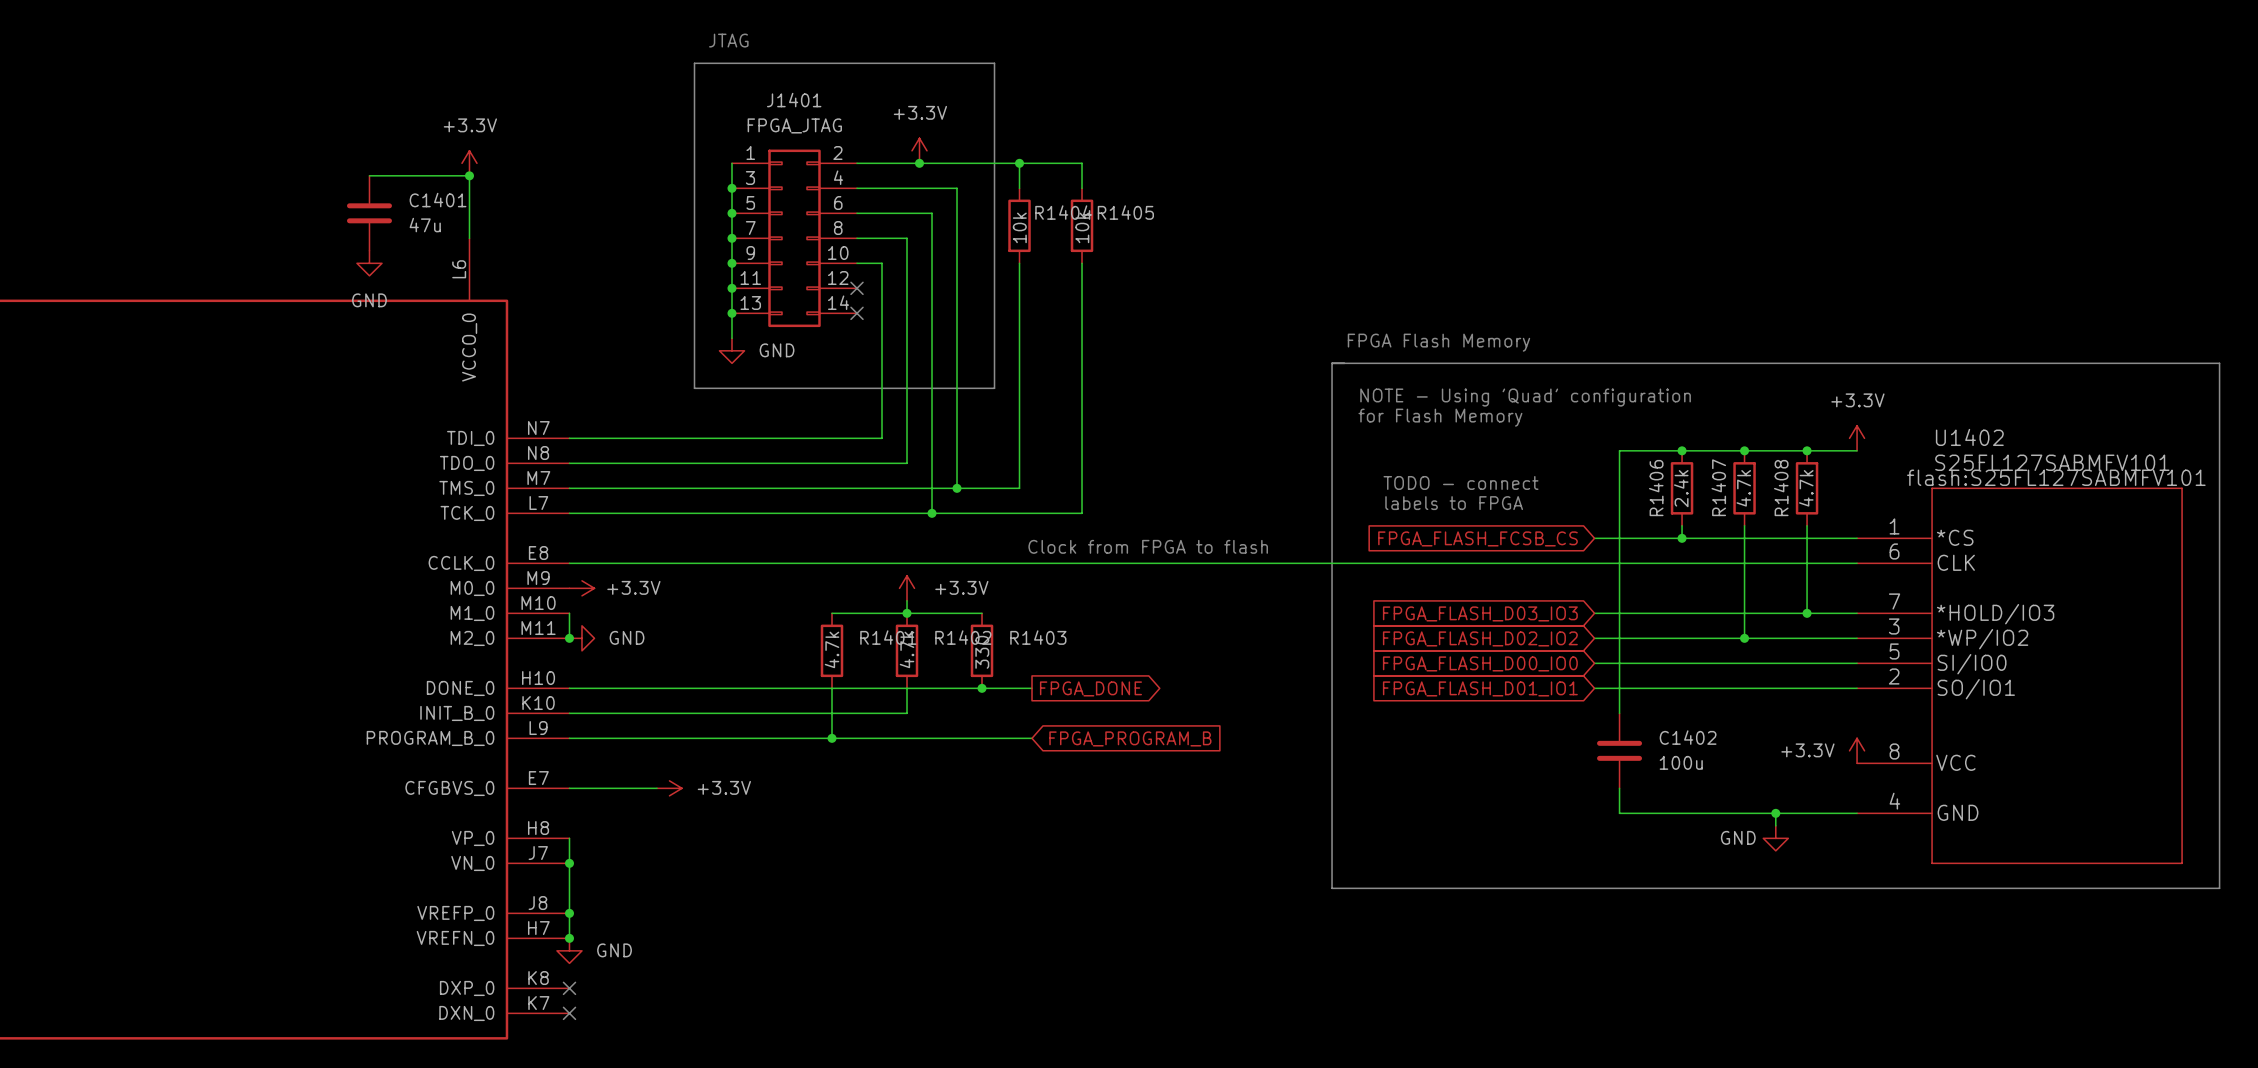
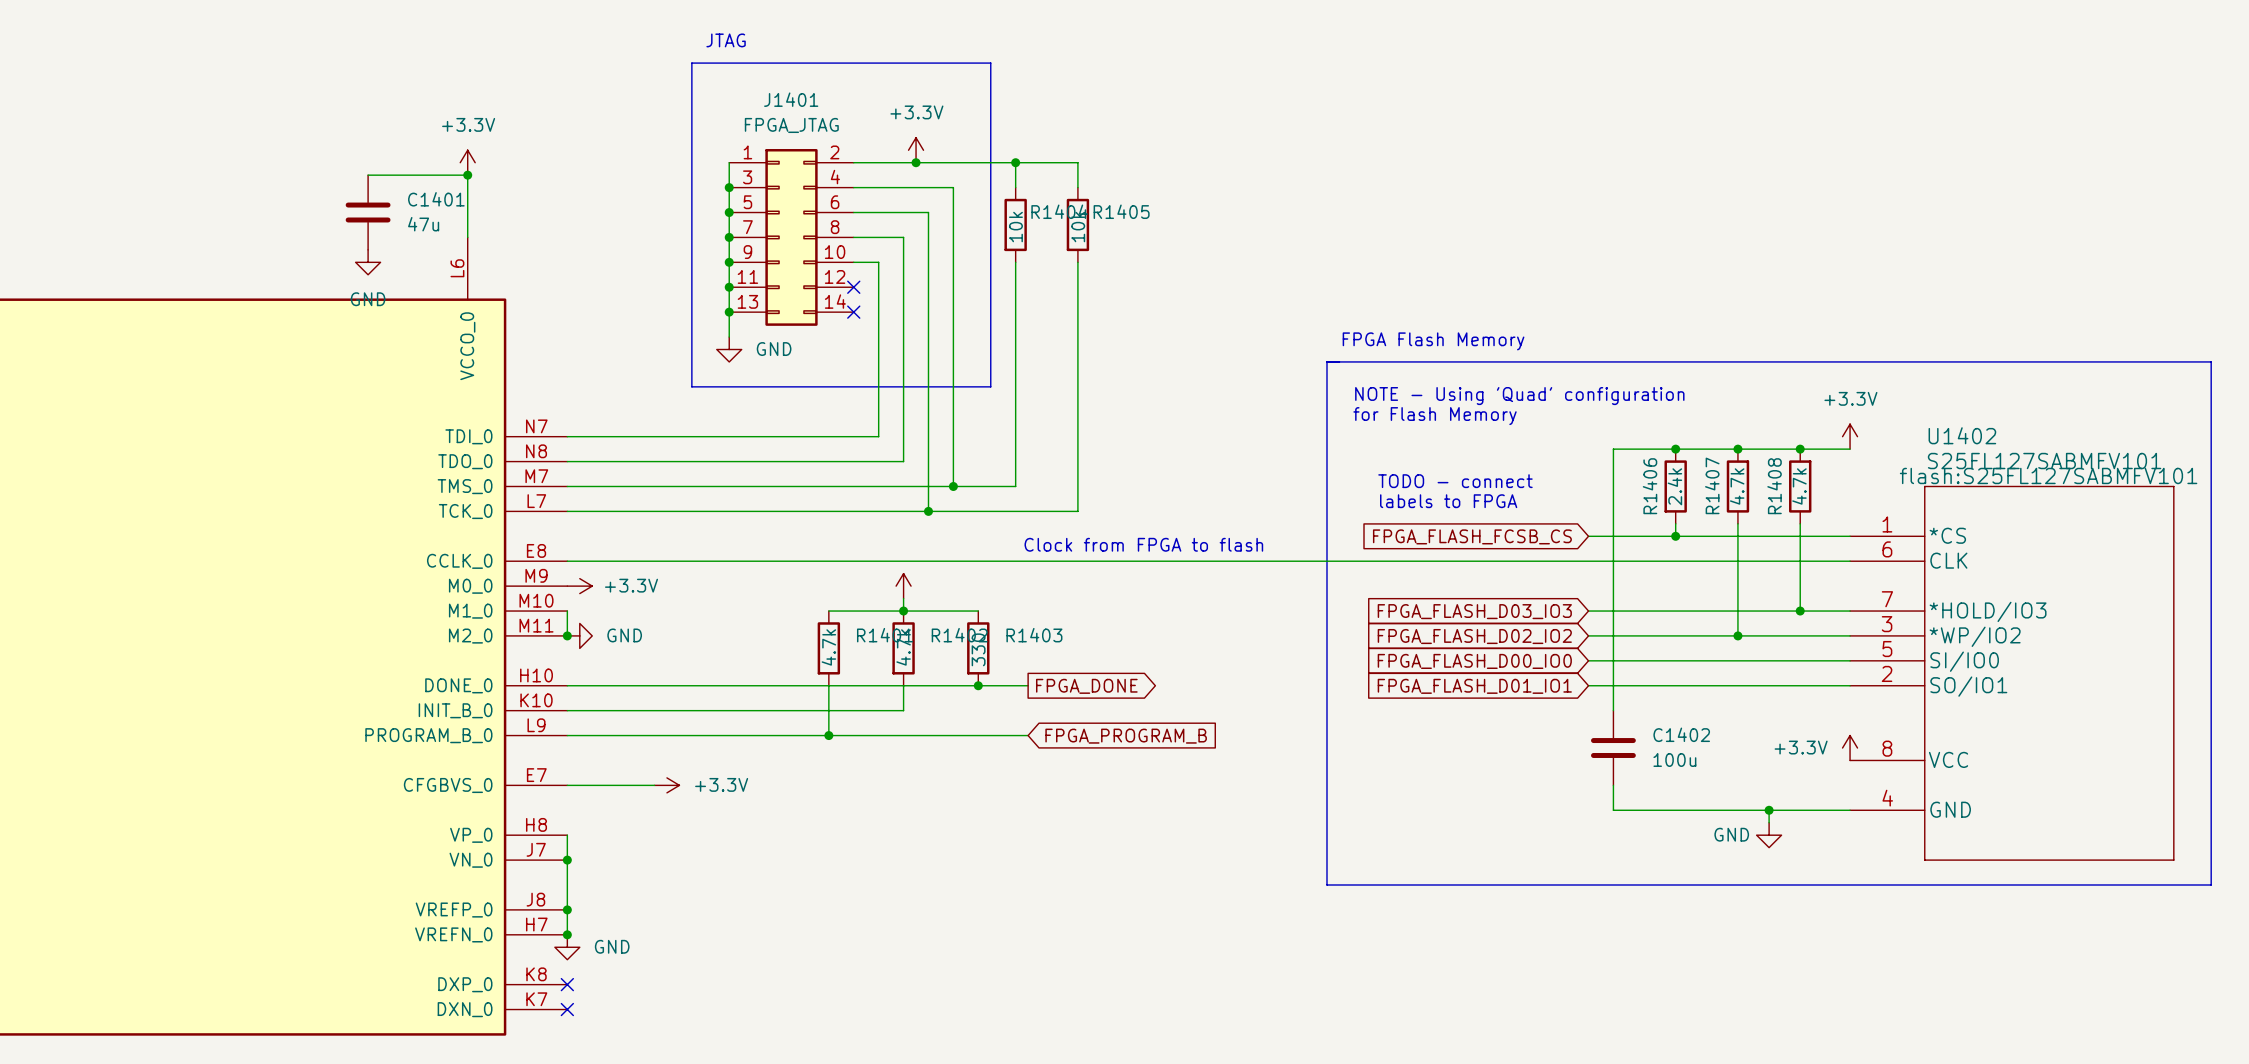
power symbol text: +3.3V (961, 587) -> none

